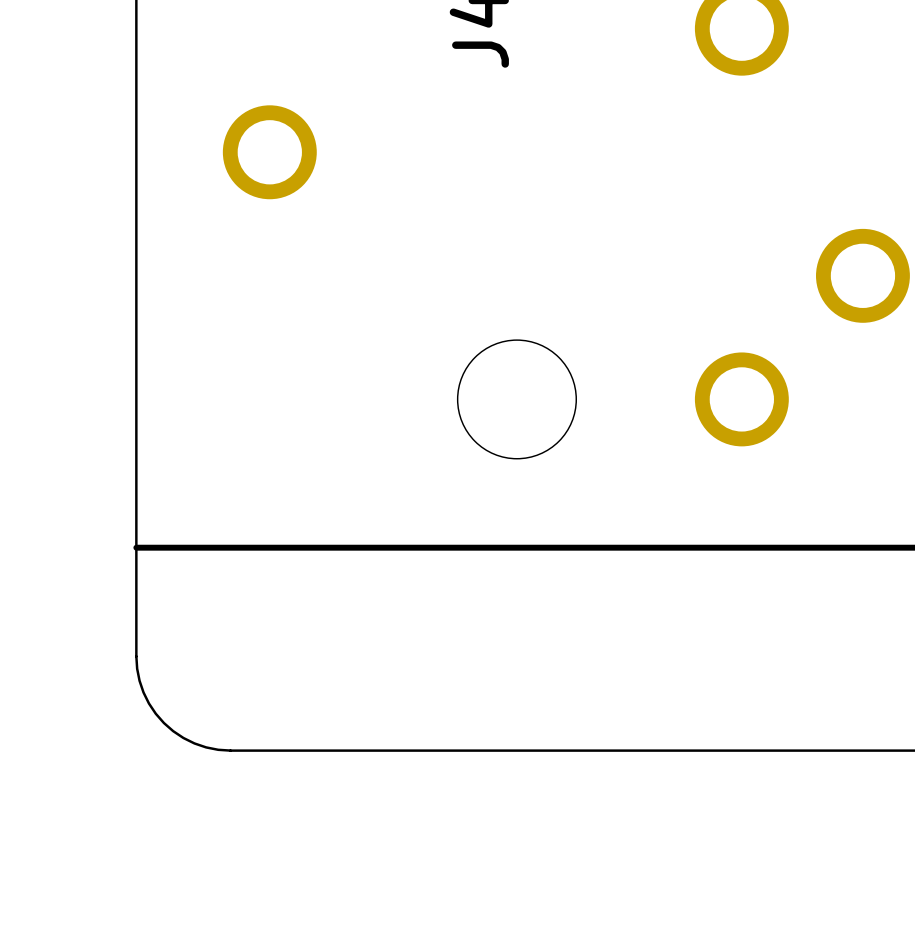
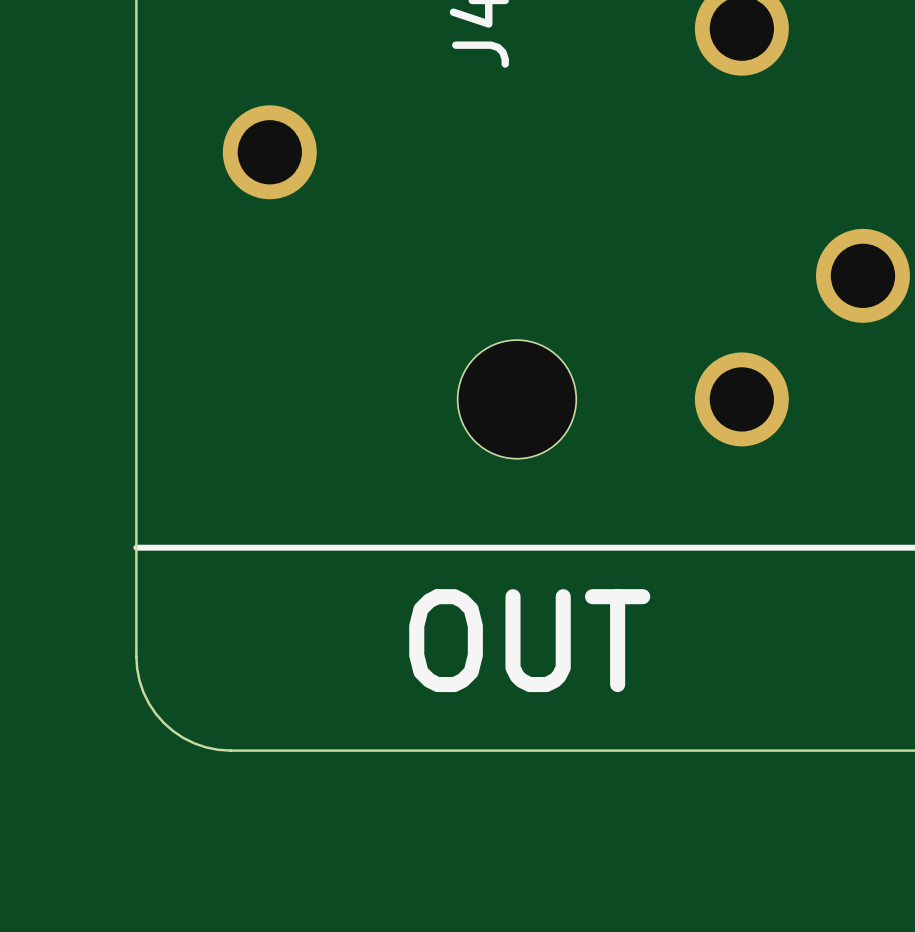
text: none -> OUT (529, 640)

